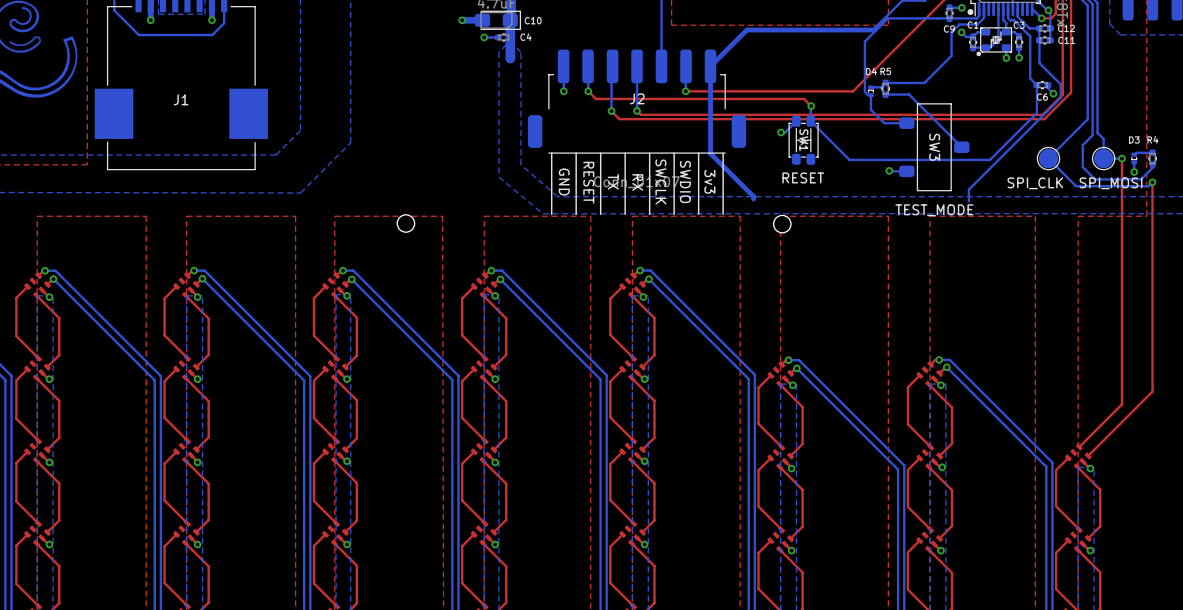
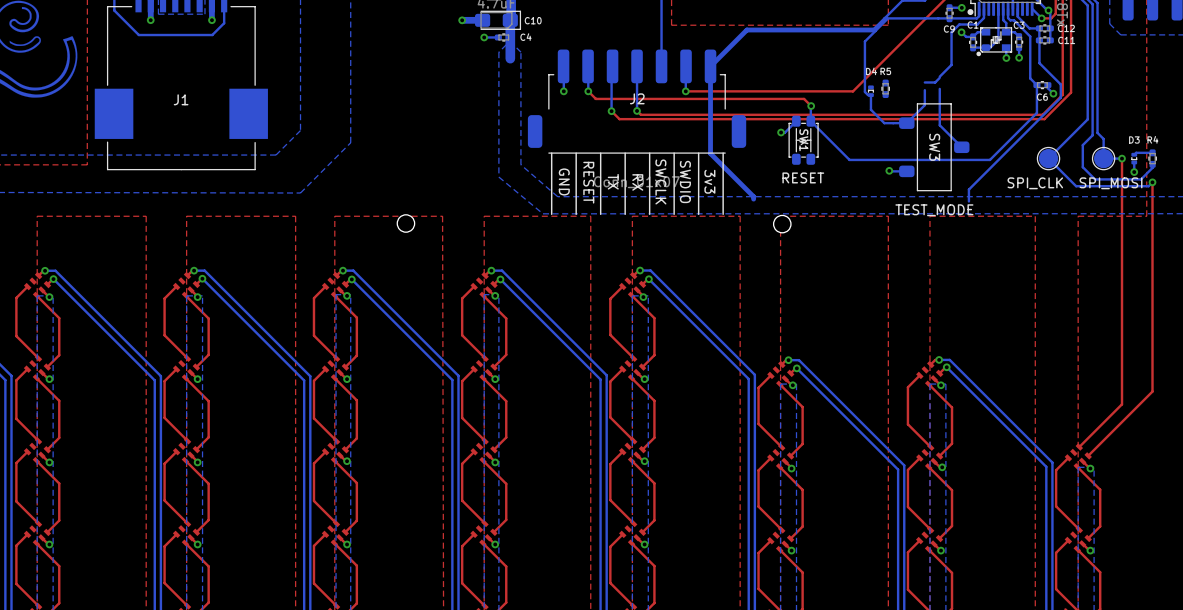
bottom track: (951, 55) (924, 83) (885, 83) (881, 87) (870, 87) -> (951, 55) (951, 64) (939, 76)
bottom track: none -> (939, 78) (935, 82) (924, 82)
bottom track: none -> (924, 90) (924, 105) (906, 123)
bottom track: (885, 94) (909, 94) (939, 125) -> (939, 88) (939, 125)

